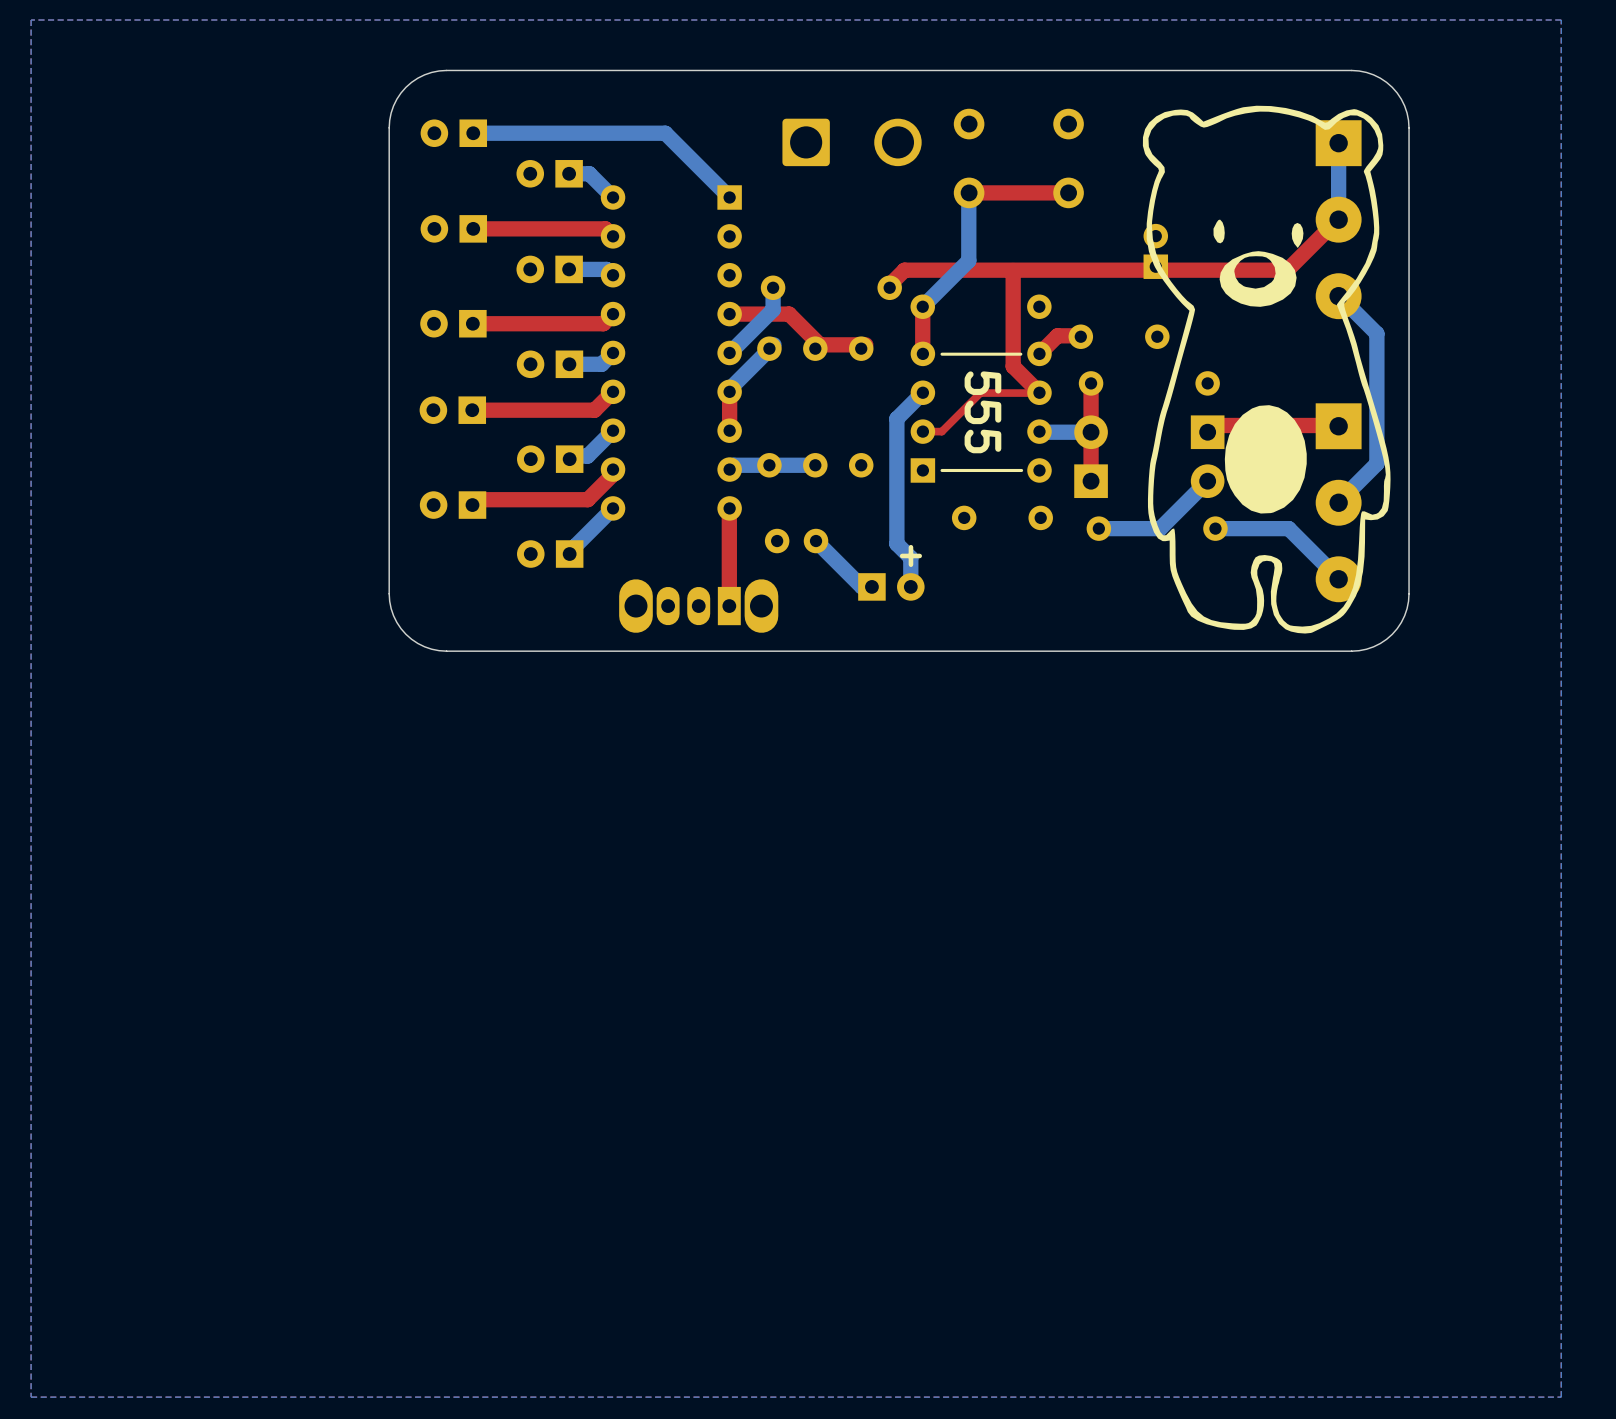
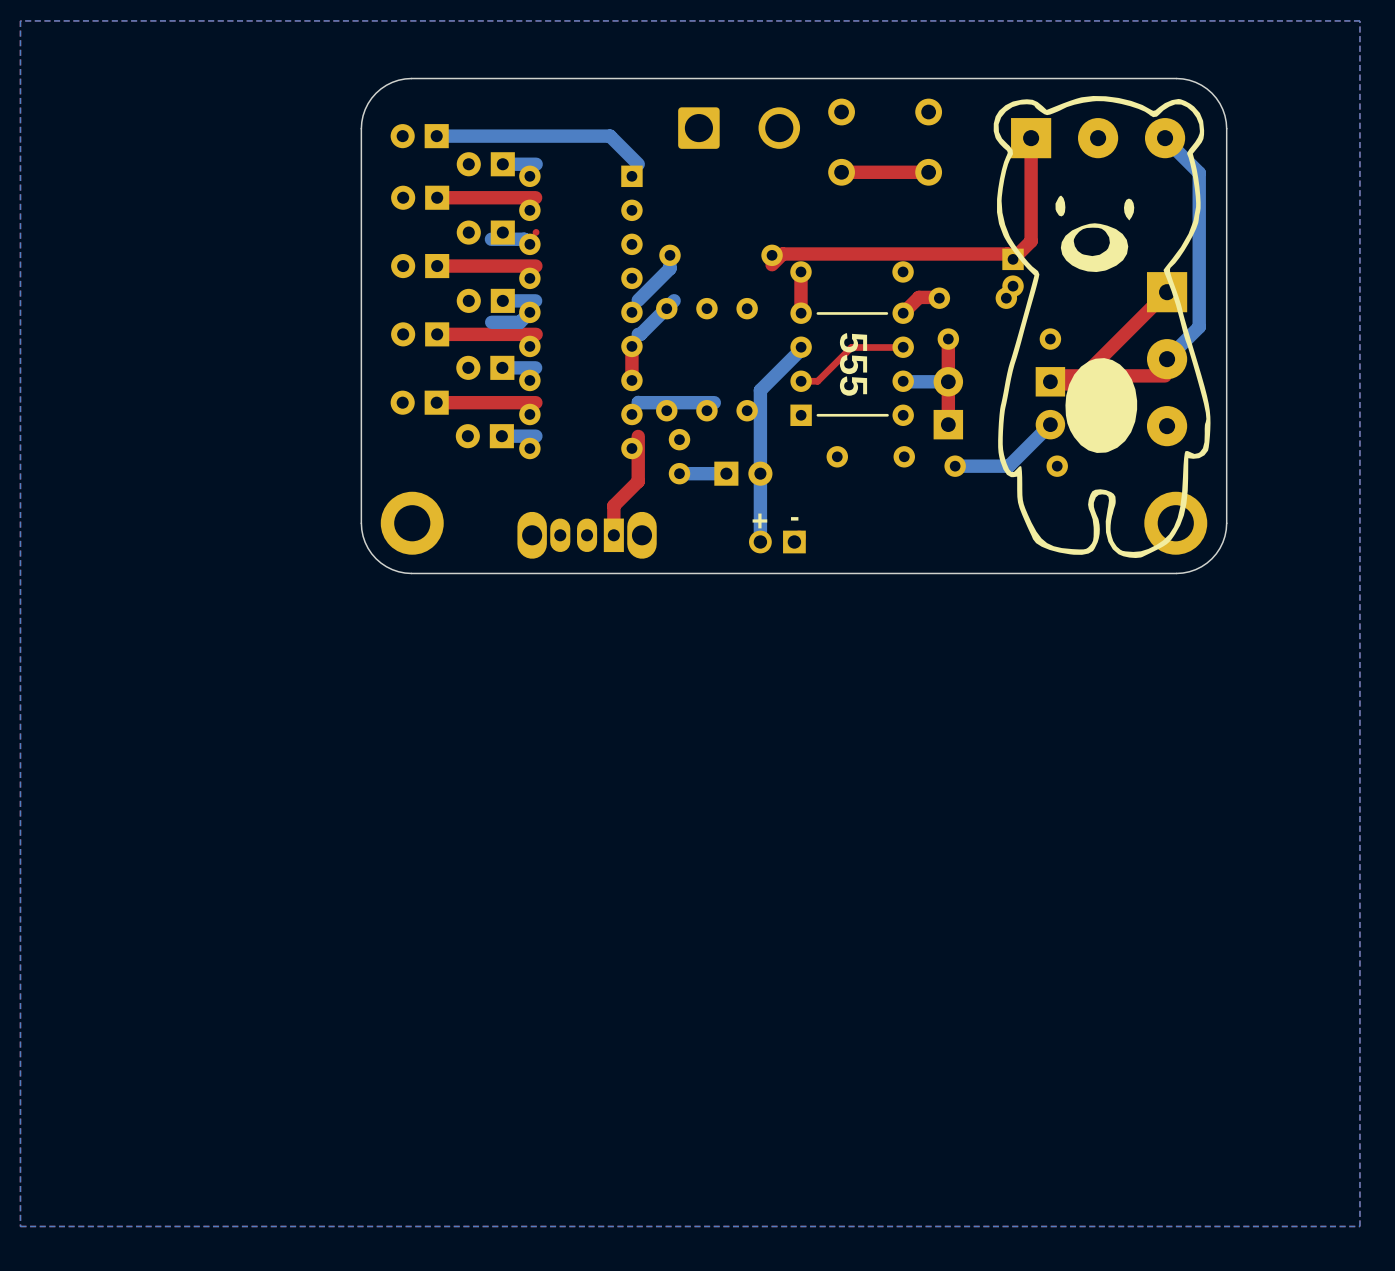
part: (453, 133) -> none
bottom track: (473, 133) (665, 133) (729, 197) -> none
board edge: (1409, 143) (1407, 113) (1397, 92) (1380, 78) (1359, 70) (446, 70) (431, 72) (417, 78) (406, 87) (396, 99) (391, 113) (389, 127) (389, 601) (393, 615) (401, 628) (417, 643) (439, 650) (477, 651) -> (1226, 128) (1222, 109) (1211, 93) (1195, 82) (1176, 78) (411, 78) (398, 80) (386, 85) (376, 93) (368, 103) (363, 115) (361, 128) (361, 523) (365, 542) (376, 558) (392, 569) (411, 573)
part: none -> (419, 136)
bottom track: none -> (436, 136) (610, 136) (638, 164)
top track: none -> (1031, 138) (1031, 241) (1013, 259) (1007, 254) (782, 254) (772, 264)
part: none -> (1098, 138)
bottom track: (1338, 154) (1338, 218) -> (1165, 138) (1199, 172) (1199, 327) (1167, 359)
part position: (549, 173) -> (485, 164)
bottom track: (569, 173) (589, 173) (613, 197) -> none
bottom track: none -> (536, 164) (502, 164)
bottom track: (968, 190) (968, 260) (922, 306) -> none
top track: (1338, 218) (1287, 270) (904, 270) (889, 285) -> none
part: (1338, 219) -> none
top track: none -> (437, 197) (536, 198)
part position: (453, 228) -> (420, 197)
top track: (473, 228) (605, 228) (613, 236) -> none
part rotation: 0° (1155, 251) -> 180° (1013, 272)
part position: (1155, 251) -> (1013, 272)
top track: none -> (536, 232) (535, 232)
part position: (549, 269) -> (485, 232)
top track: (1013, 270) (1013, 366) (1039, 392) -> none
bottom track: (1337, 295) (1376, 333) (1376, 463) (1338, 502) -> none
part: none -> (420, 266)
top track: none -> (437, 266) (536, 266)
bottom track: (773, 302) (773, 309) (729, 352) -> (669, 268) (638, 300)
top track: (613, 314) (603, 323) (472, 323) -> none
top track: (734, 314) (789, 314) (819, 344) (865, 344) -> none
part: (453, 323) -> none
top track: none -> (1167, 292) (1075, 383) (1050, 383)
part: none -> (485, 300)
bottom track: none -> (535, 300) (502, 300)
bottom track: none -> (674, 300) (640, 334) (638, 334)
bottom track: (774, 344) (729, 389) (729, 391) -> none
part: (549, 364) -> none
part: none -> (420, 334)
top track: none -> (536, 334) (437, 334)
top track: (613, 391) (594, 410) (472, 410) -> none
bottom track: (922, 392) (896, 418) (896, 543) (910, 557) (910, 586) -> none
bottom track: none -> (801, 349) (760, 390) (760, 541)
part: none -> (1167, 359)
part: (452, 410) -> none
part: none -> (485, 367)
bottom track: none -> (535, 367) (502, 367)
bottom track: (613, 430) (587, 456) (575, 456) -> none
top track: none -> (536, 402) (436, 402)
bottom track: none -> (638, 402) (714, 402)
part: none -> (419, 402)
part: (550, 459) -> none
bottom track: (816, 465) (733, 465) (729, 469) -> none
top track: (613, 469) (613, 474) (587, 499) (477, 499) (472, 505) -> none
part: none -> (484, 436)
bottom track: none -> (535, 436) (501, 436)
top track: none -> (638, 436) (638, 481) (613, 505) (613, 535)
part: (1338, 502) -> none
part: (453, 505) -> none
bottom track: (613, 508) (575, 546) (575, 554) -> none
top track: (729, 508) (729, 606) -> none
bottom track: (1215, 528) (1288, 528) (1338, 578) -> none
bottom track: none -> (726, 473) (679, 473)
part rotation: 0° (796, 541) -> 90° clockwise (679, 456)
bottom track: (816, 541) (861, 586) (871, 586) -> none
part: (550, 554) -> none
text position: + (910, 555) -> + (759, 520)
part position: (891, 586) -> (743, 473)
text: none -> - (794, 518)
part: none -> (412, 523)
part: none -> (1175, 523)
part position: (698, 606) -> (587, 535)
part: none -> (777, 541)

